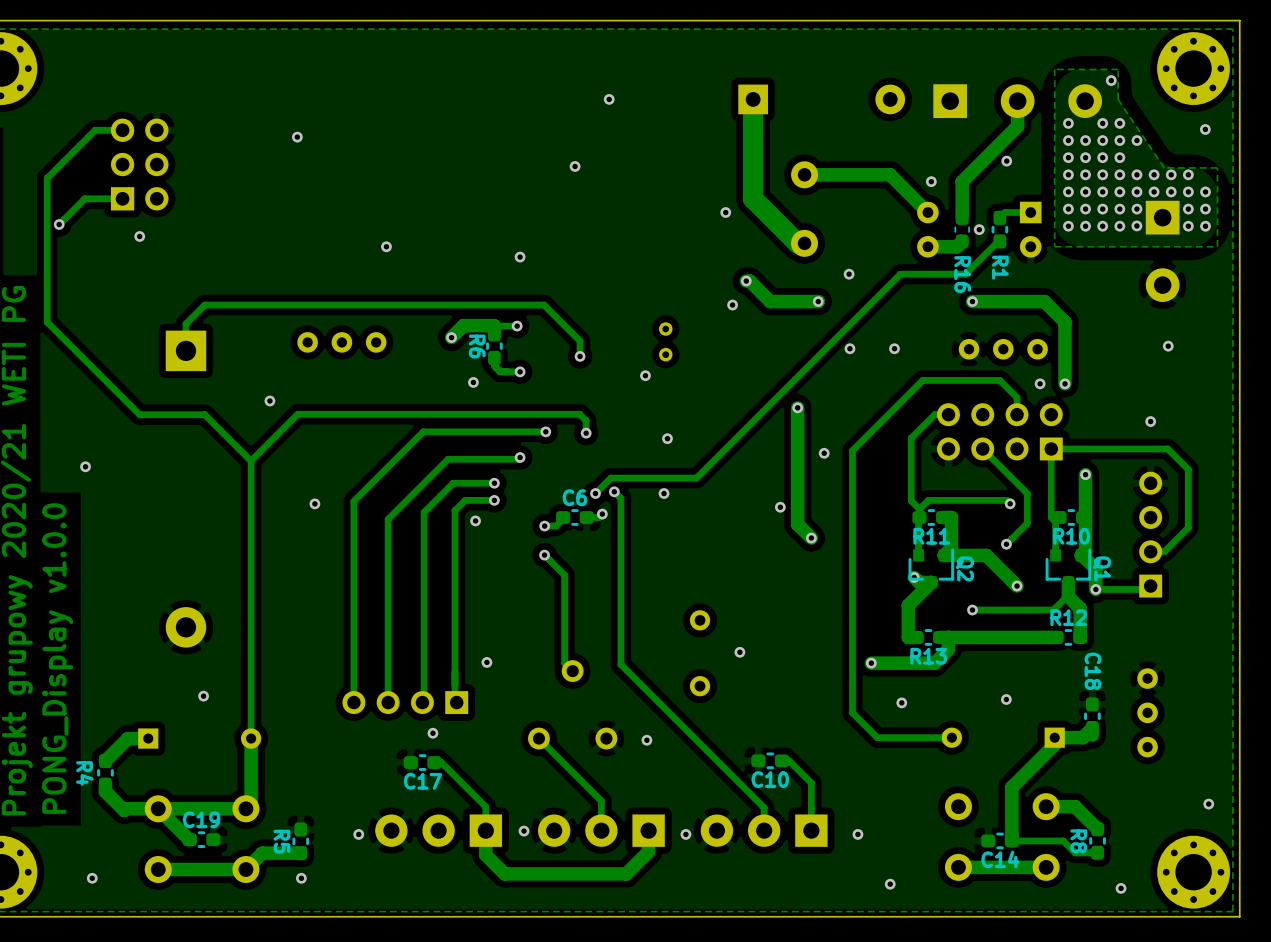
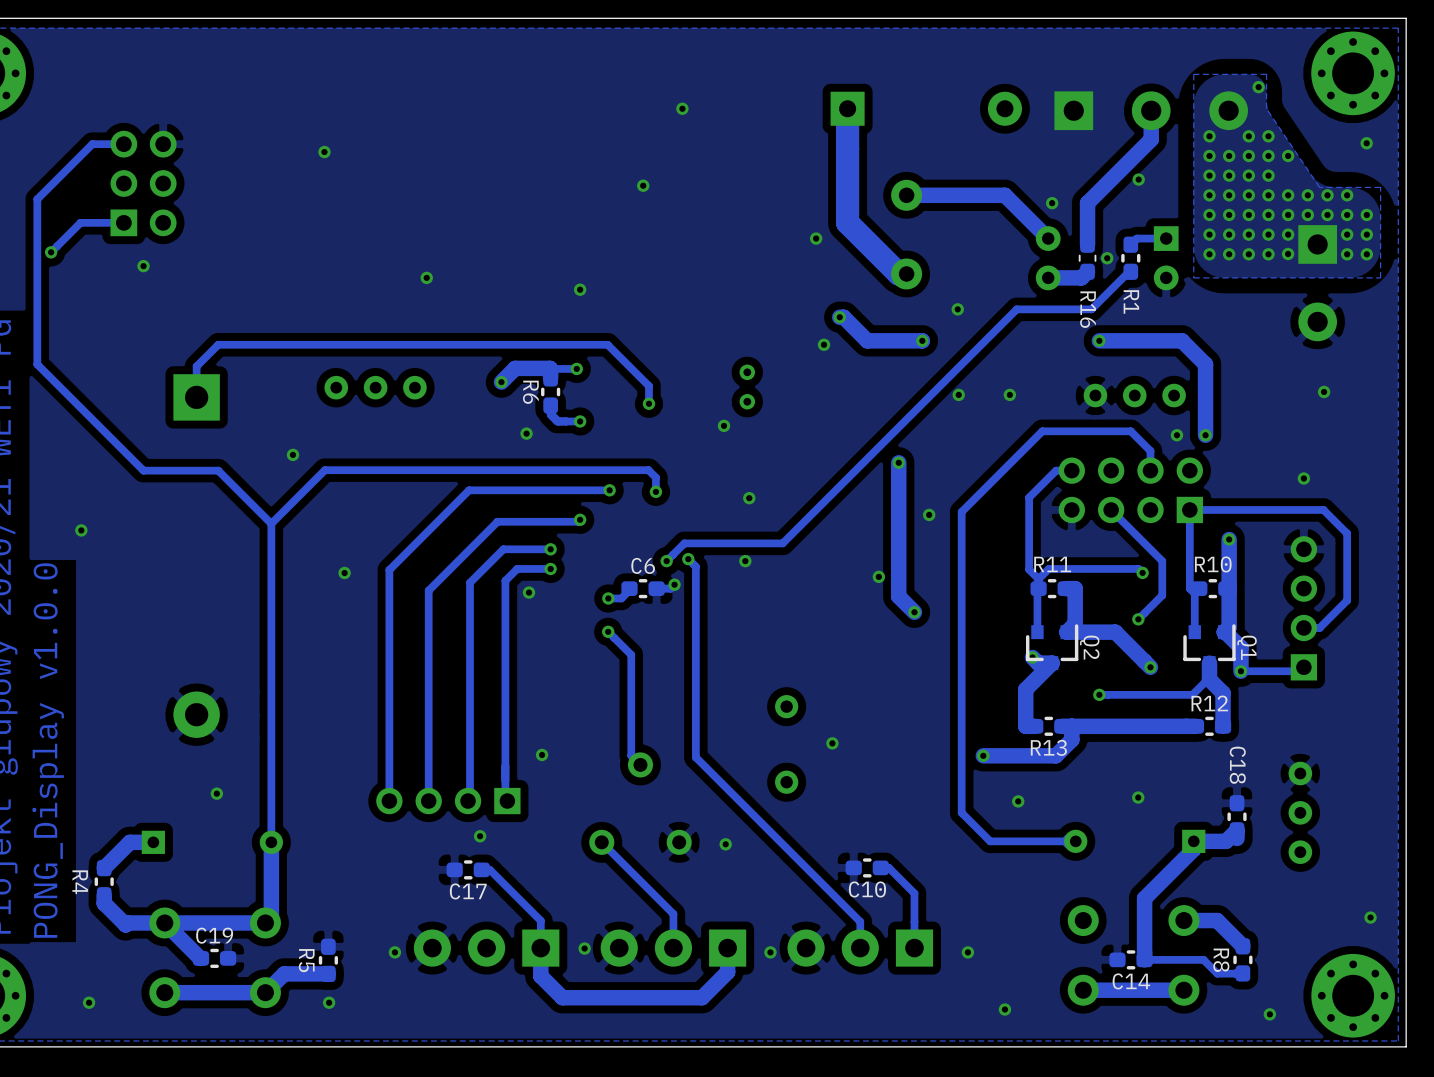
R11 name position: R11 (931, 536) -> R11 (1052, 564)
R10 name position: R10 (1071, 536) -> R10 (1213, 564)

